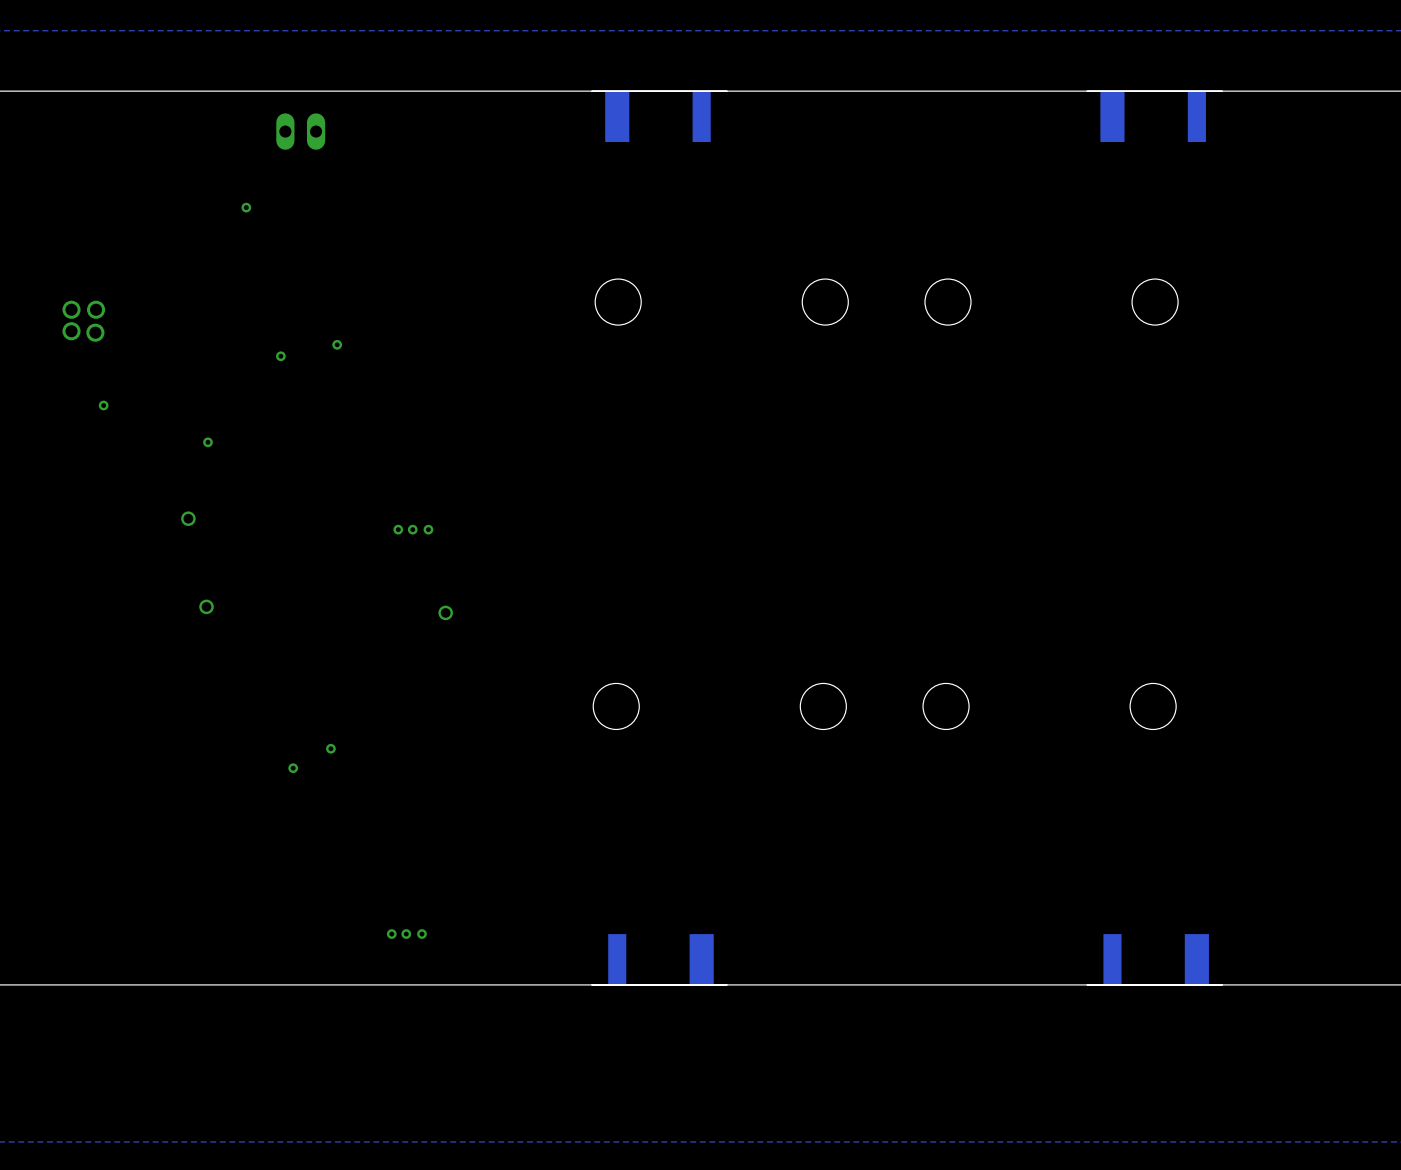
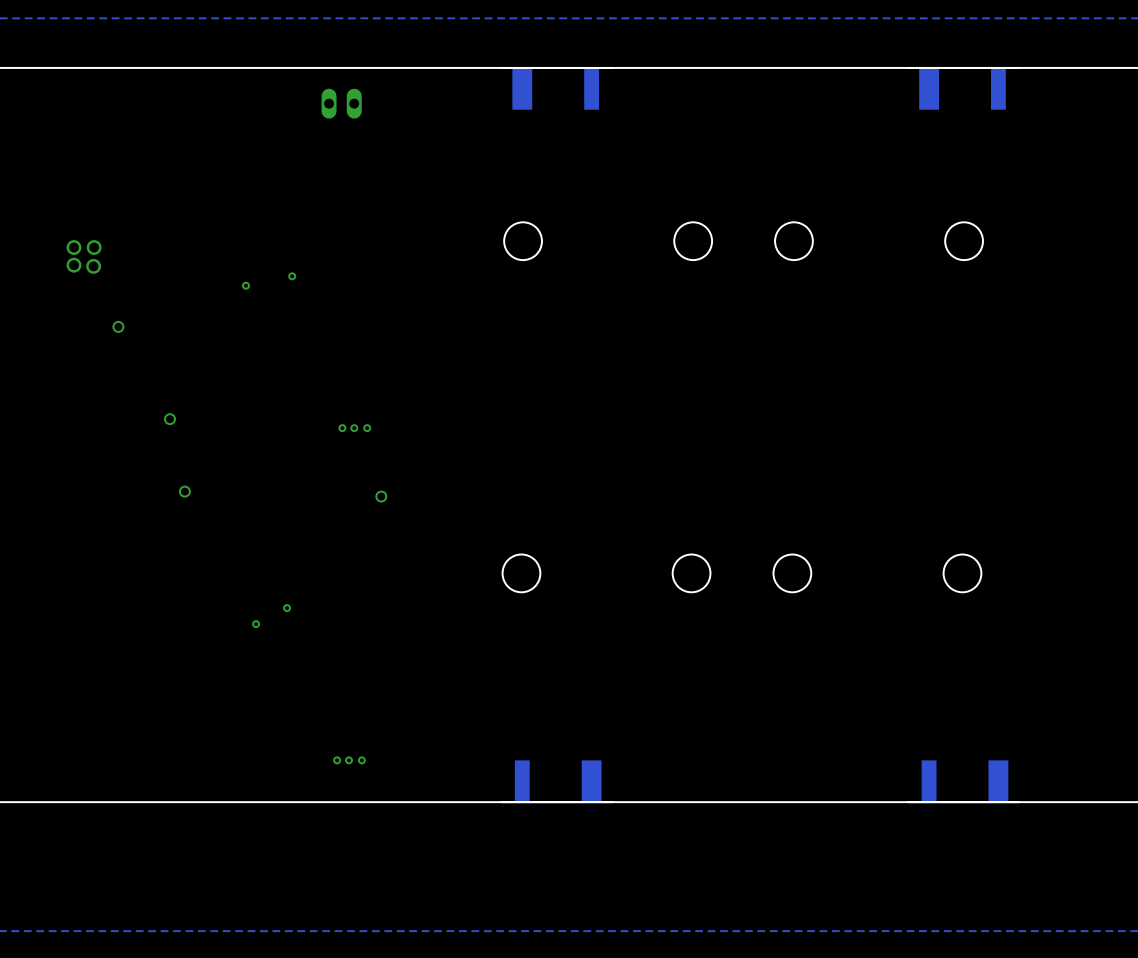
part position: (300, 131) -> (341, 103)
via: (246, 207) -> none
via: (103, 405) -> none
via: none -> (118, 326)
via: (207, 442) -> none

